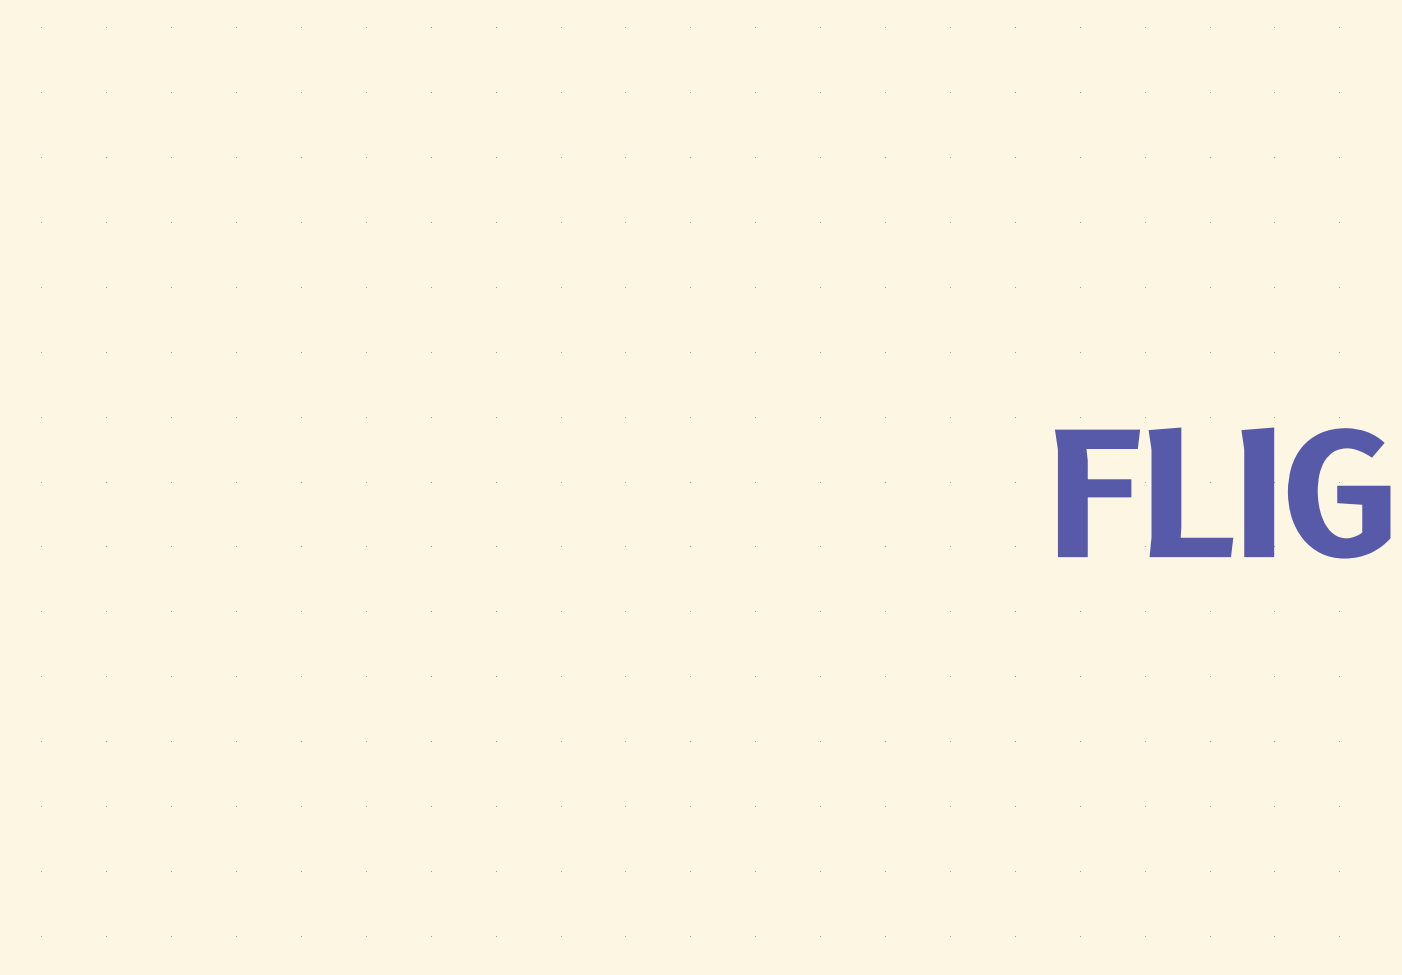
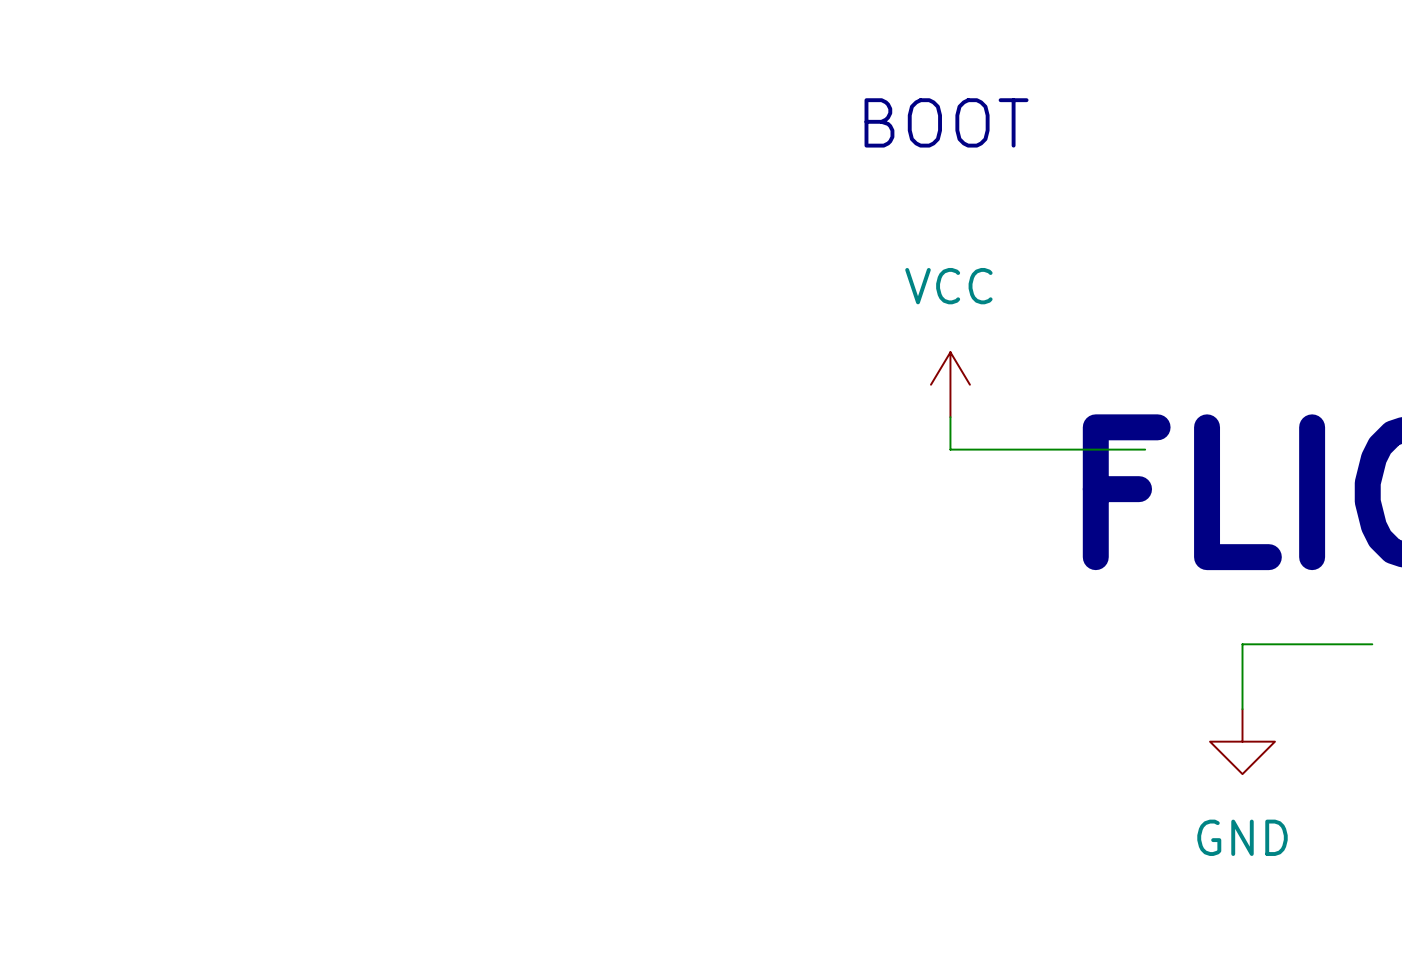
text: none -> BOOT (946, 122)
power symbol: none -> VCC (950, 384)
wire: none -> (950, 417) (950, 449) (1145, 449)
wire: none -> (1372, 644) (1242, 644) (1242, 709)
power symbol: none -> GND (1242, 741)

